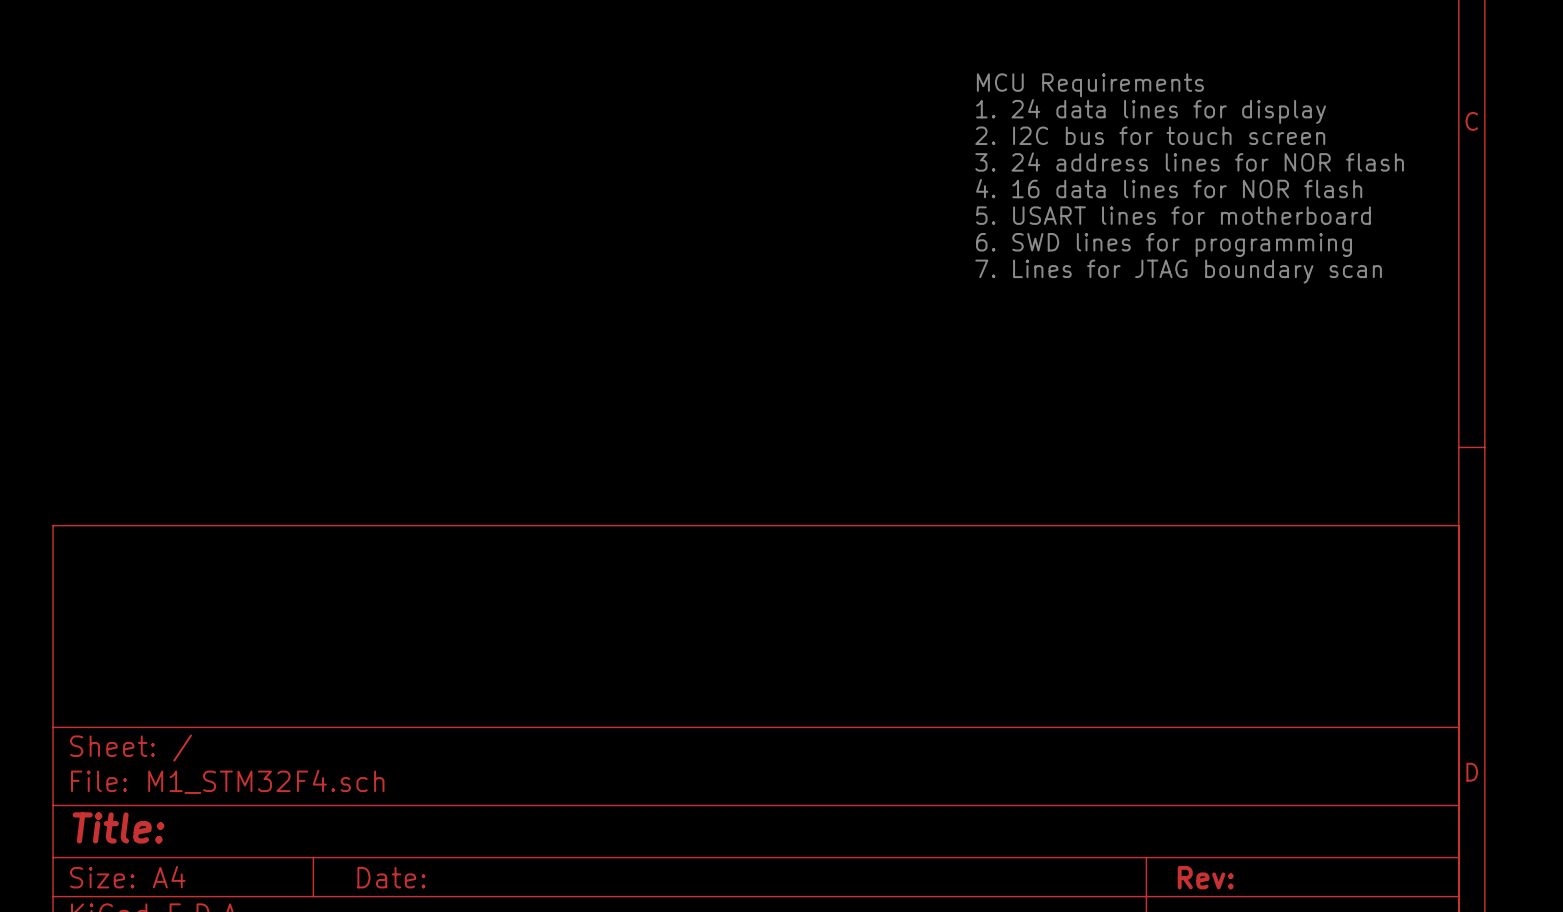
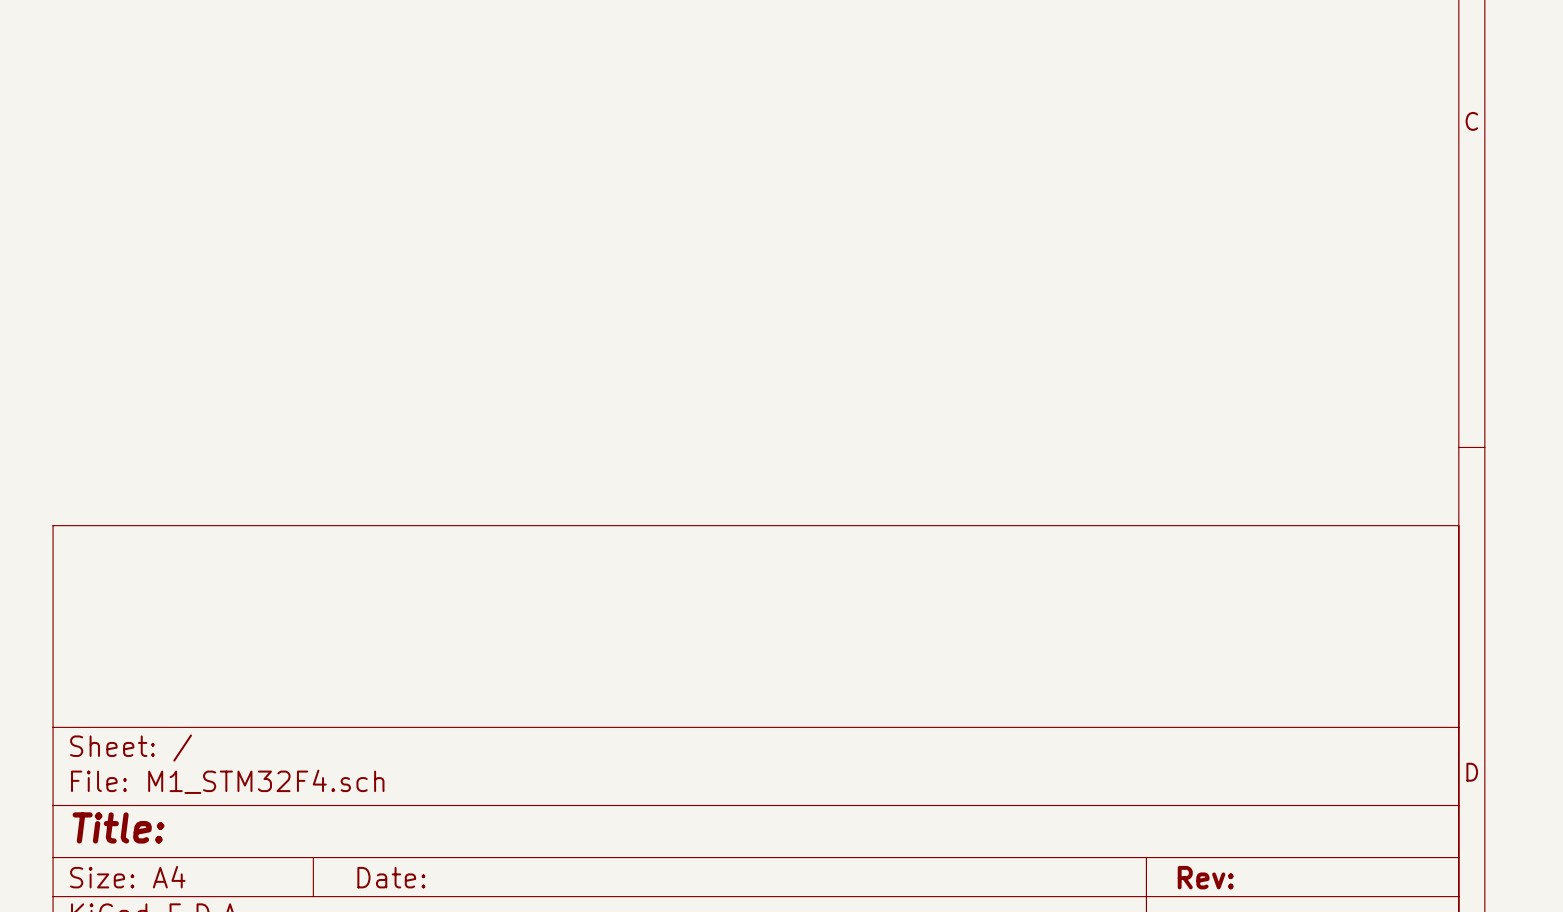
text: MCU Requirements (1090, 85) -> none
text: 1. 24 data lines for display (1151, 111) -> none
text: 2. I2C bus for touch screen (1150, 135) -> none
text: 3. 24 address lines for NOR flash (1189, 161) -> none
text: 4. 16 data lines for NOR flash (1169, 188) -> none
text: 5. USART lines for motherboard (1173, 215) -> none
text: 6. SWD lines for programming (1164, 244) -> none
text: 7. Lines for JTAG boundary scan (1178, 271) -> none

